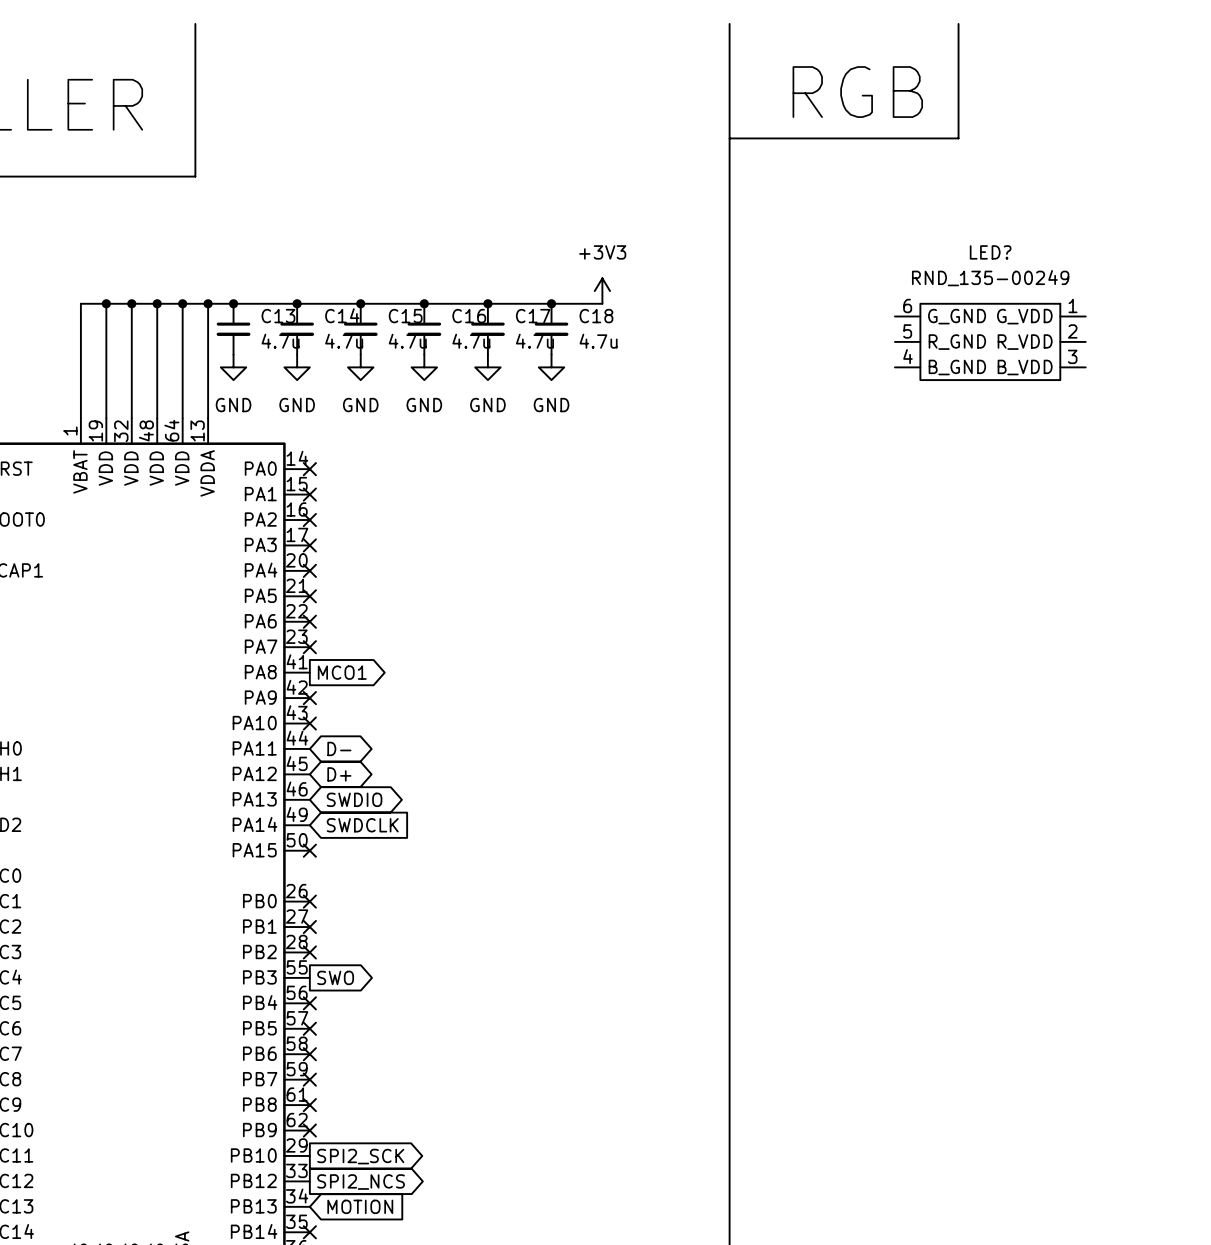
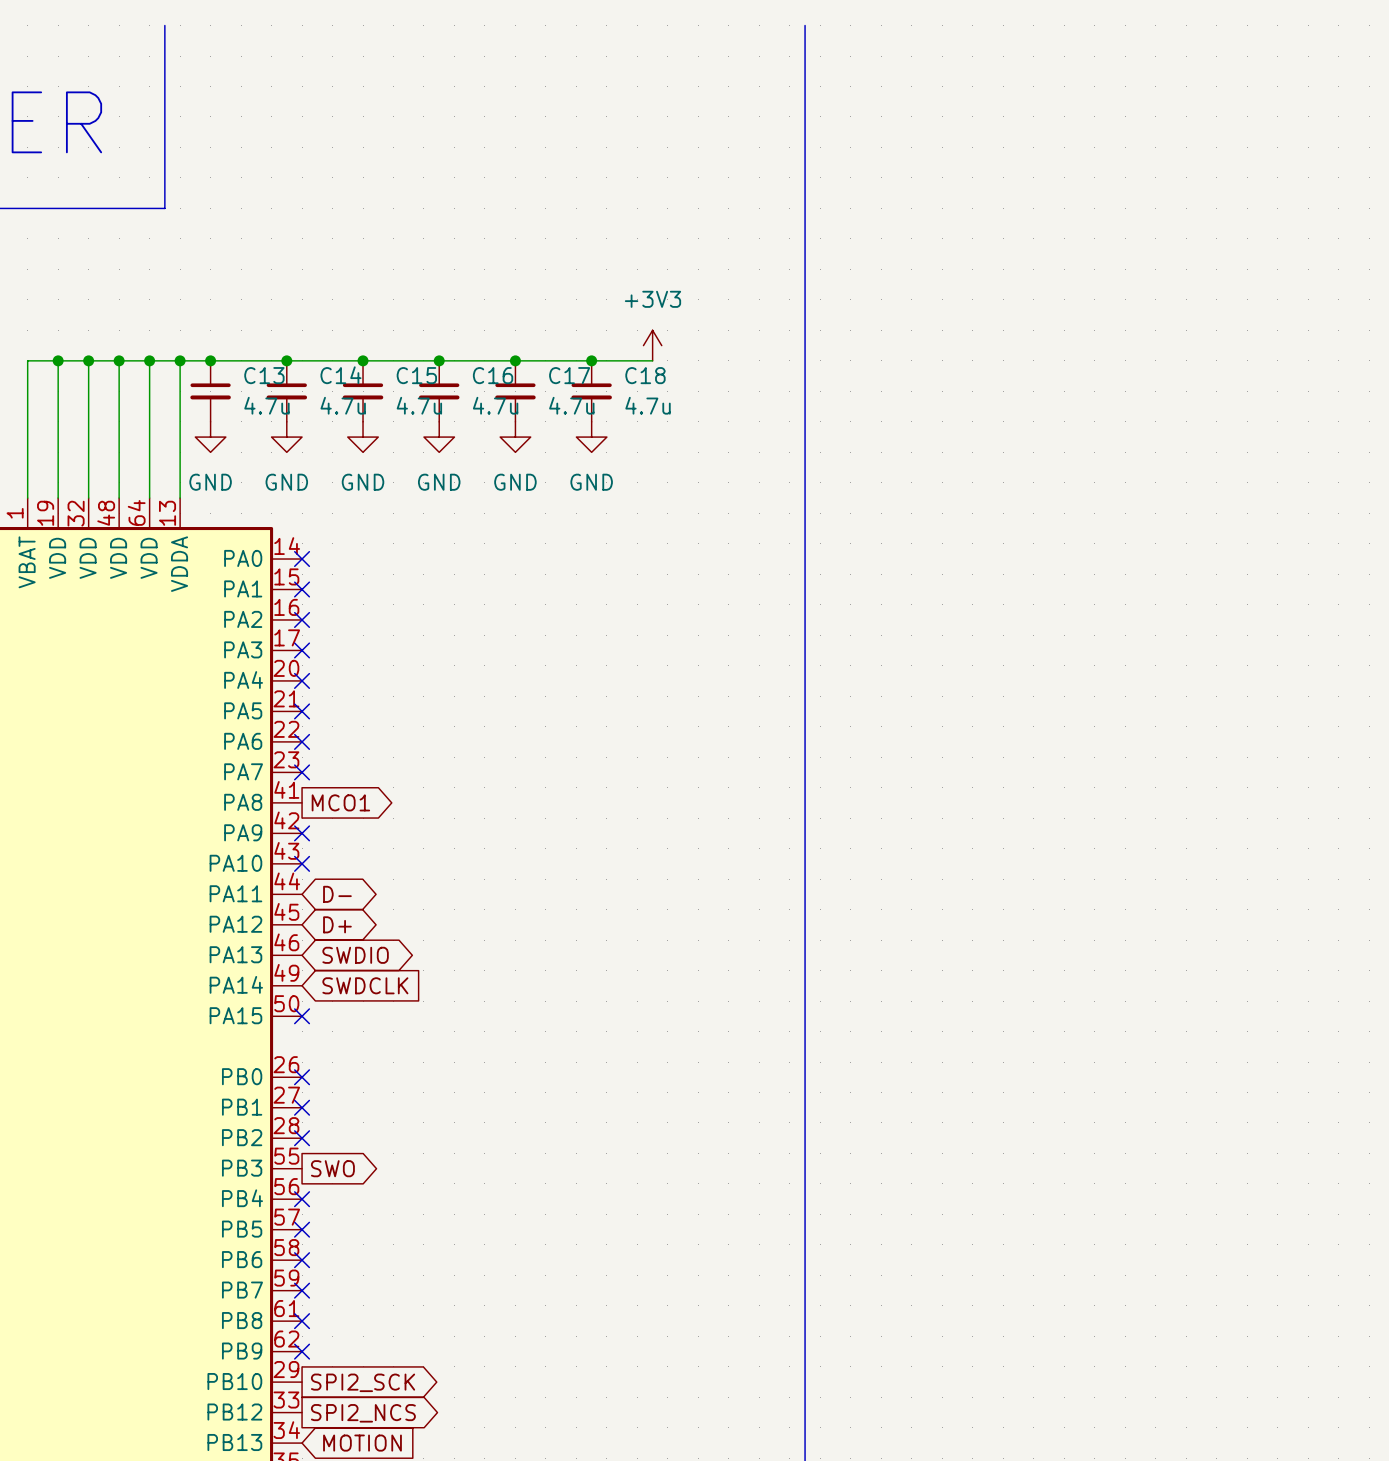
line: (958, 23) (958, 138) (729, 138) -> none
text: RGB (857, 92) -> none
LED?: RND_135-00249 (990, 341) -> none

